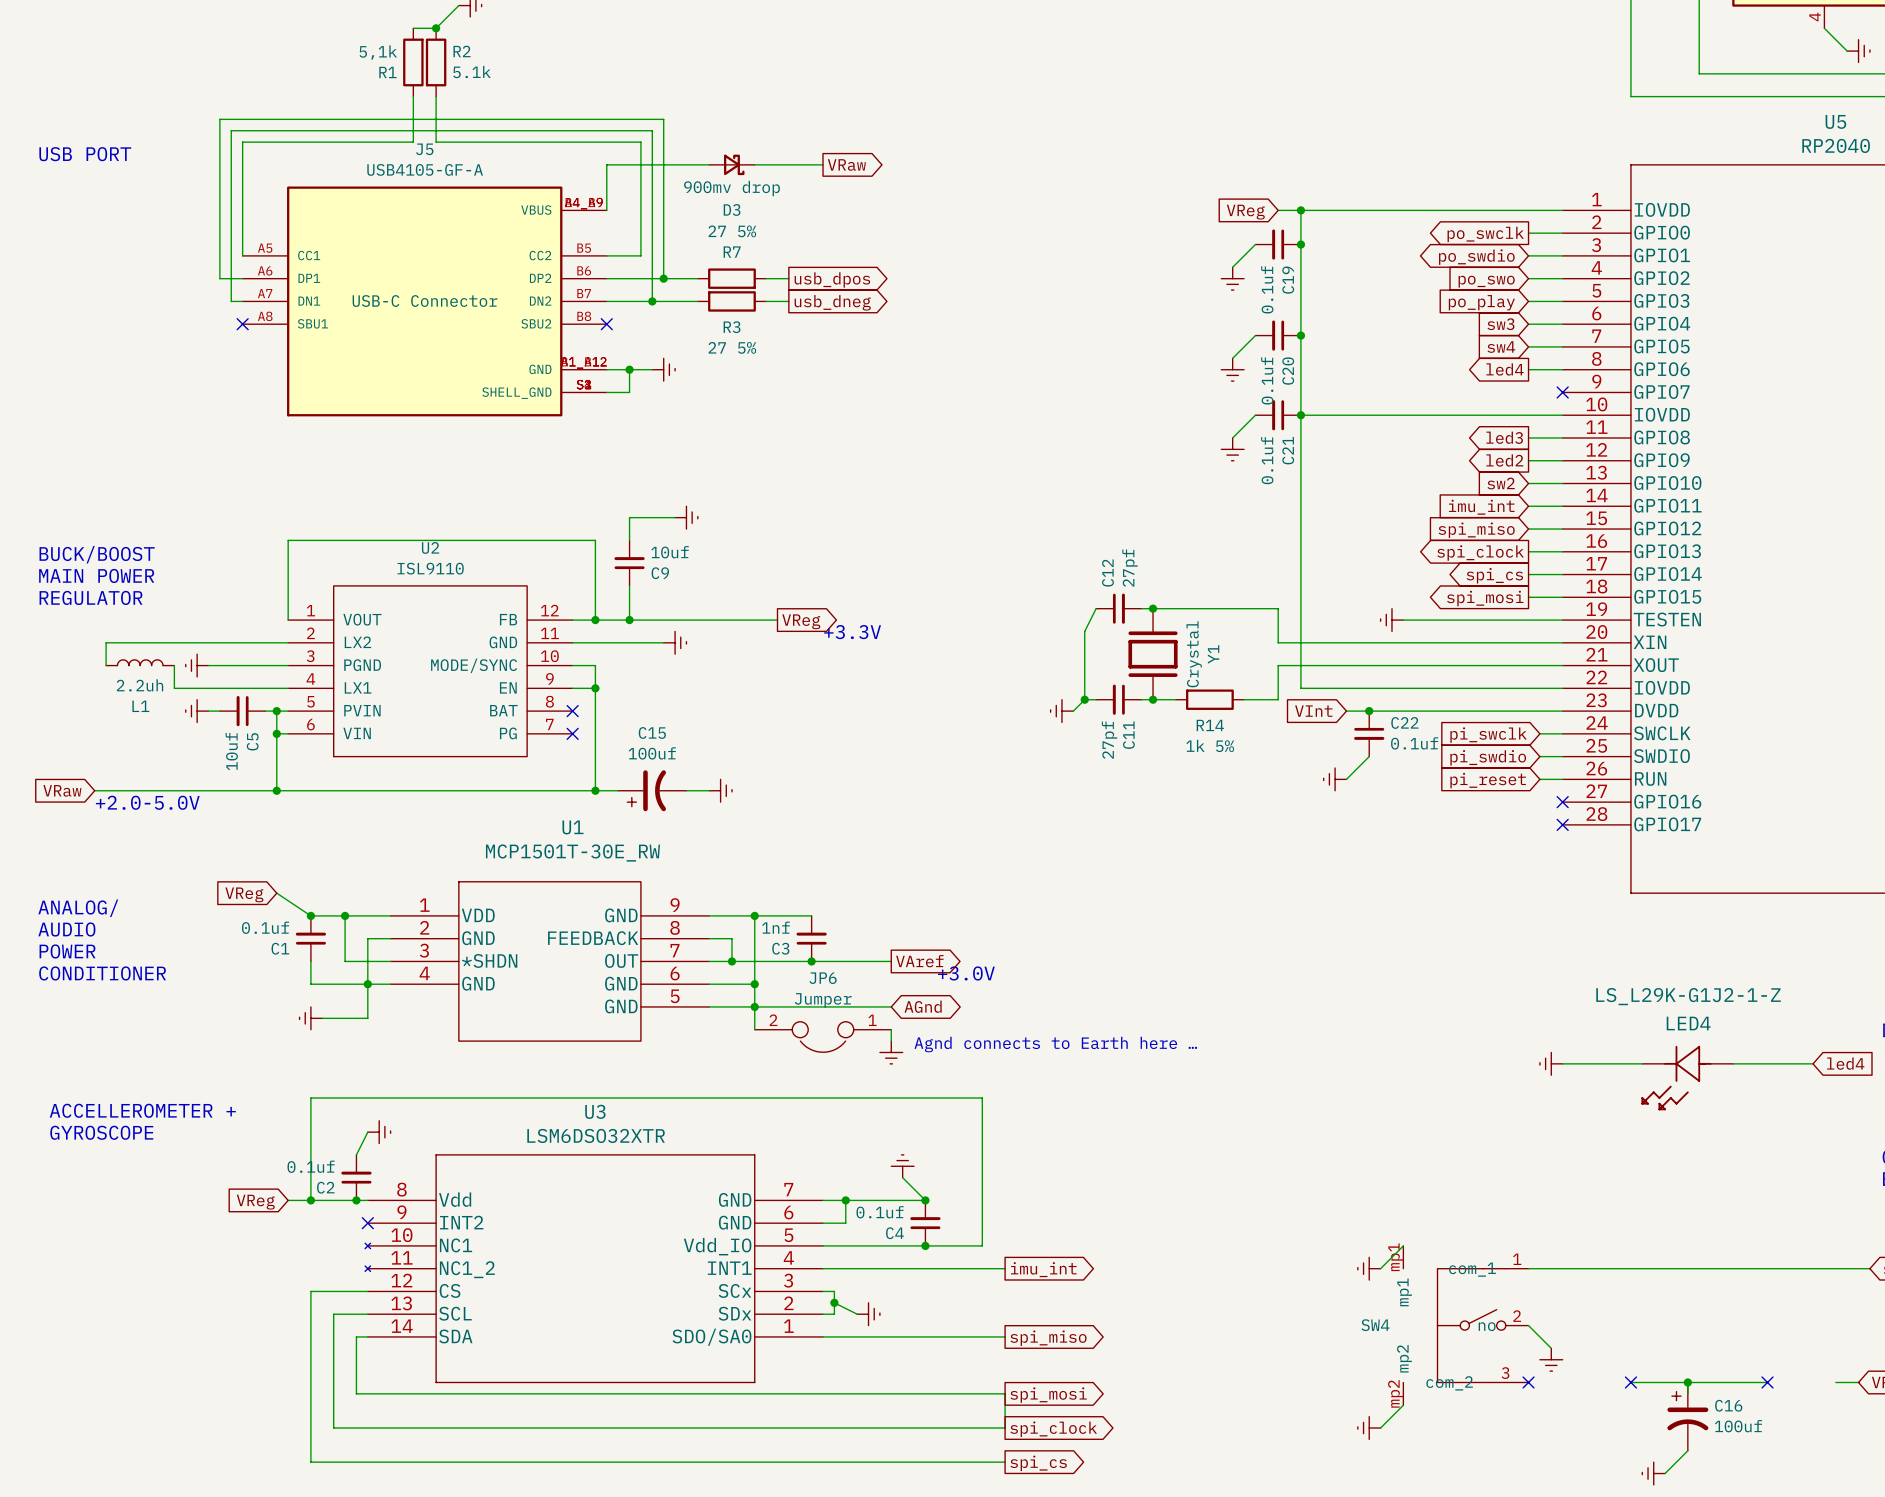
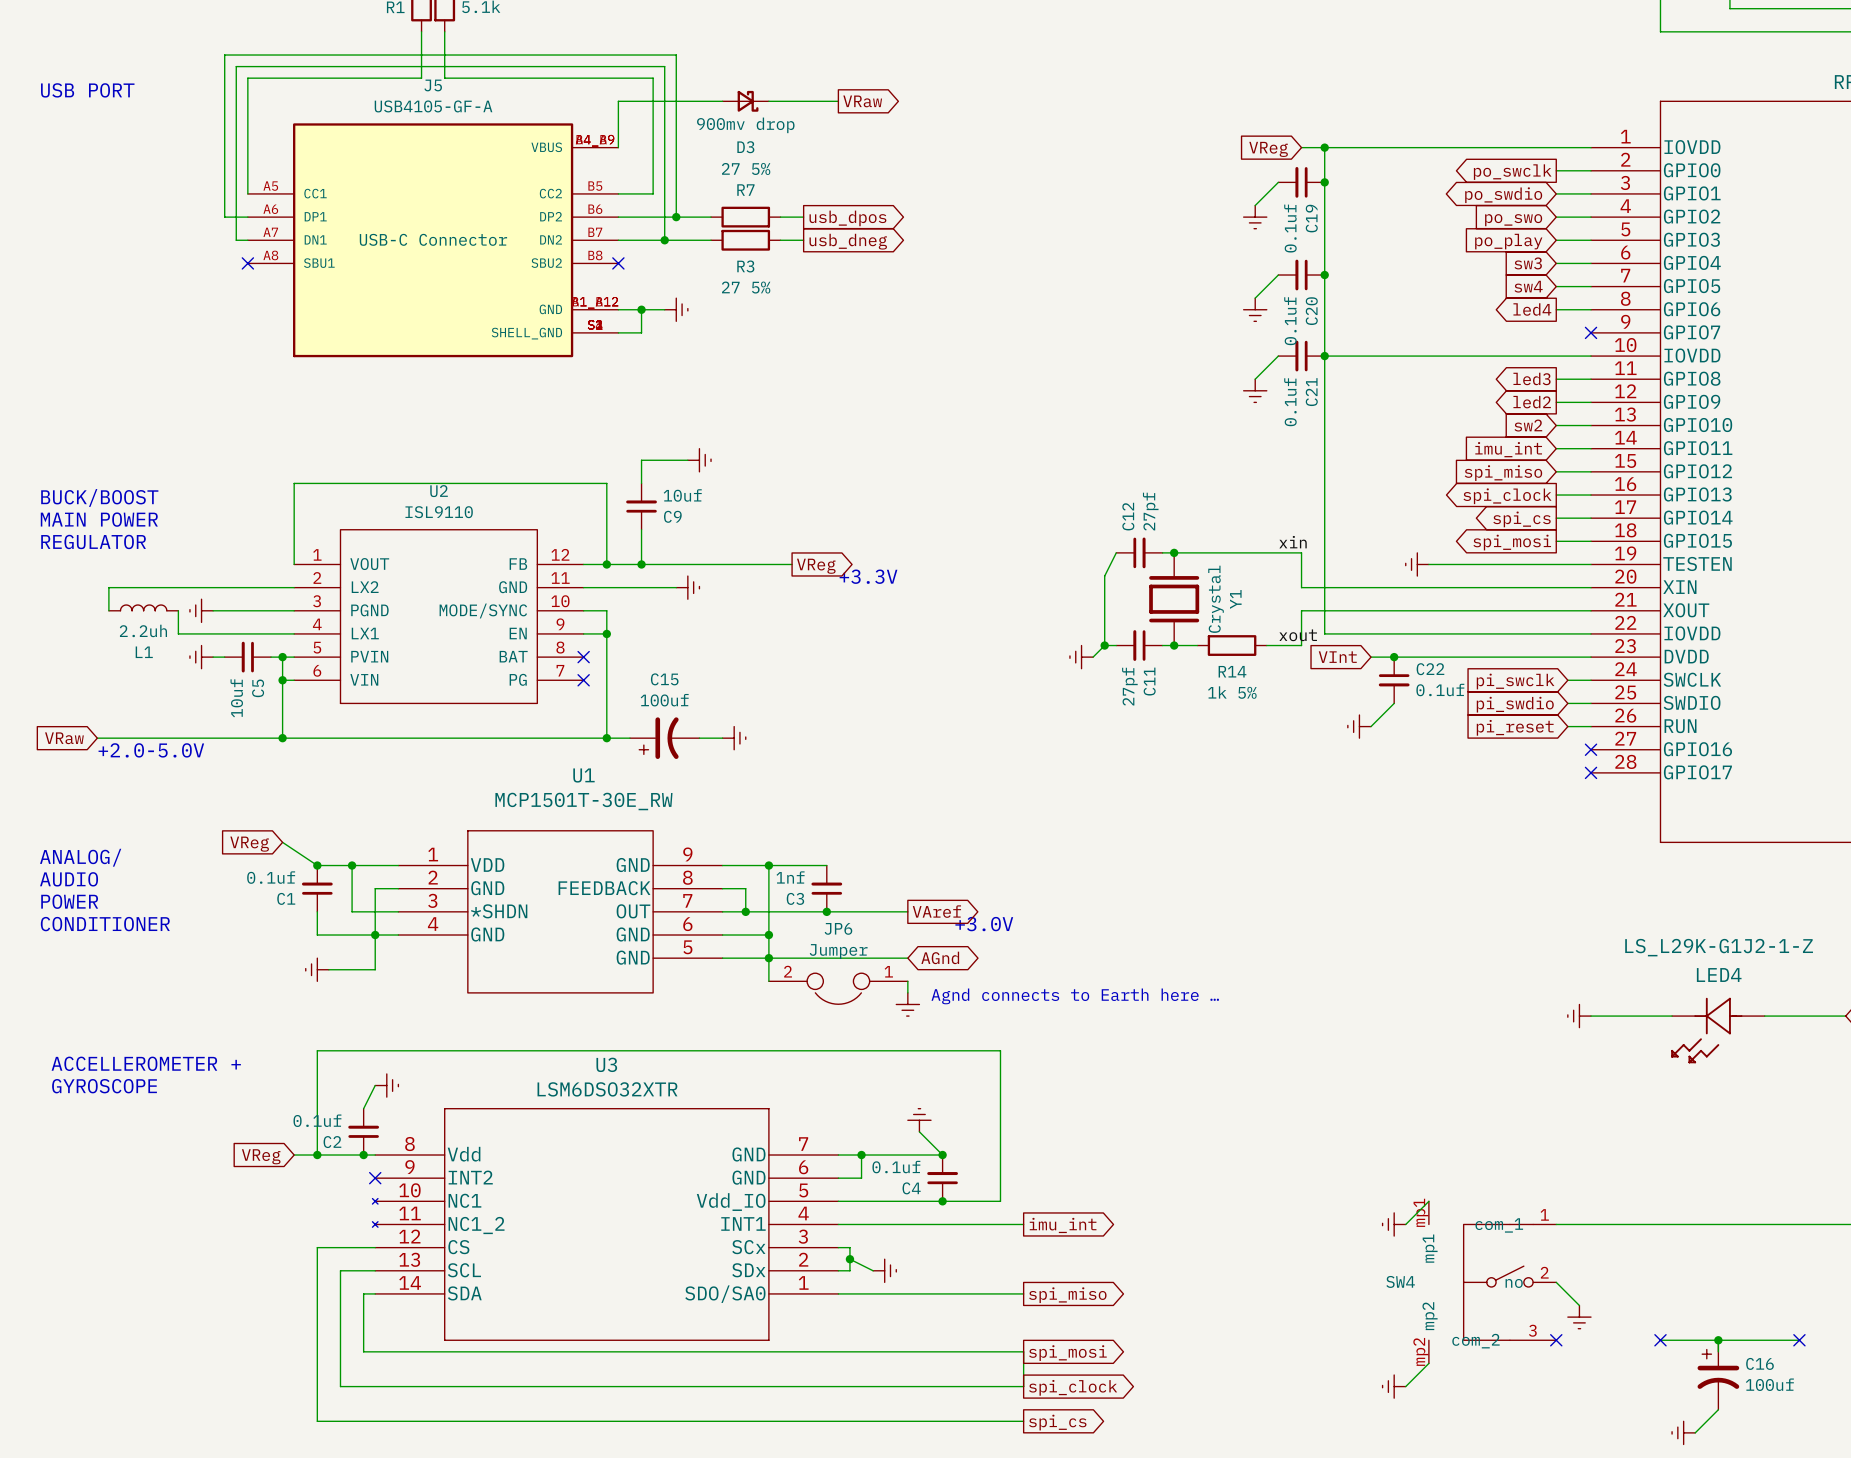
label: none -> xin (1293, 542)
label: none -> xout (1298, 635)

